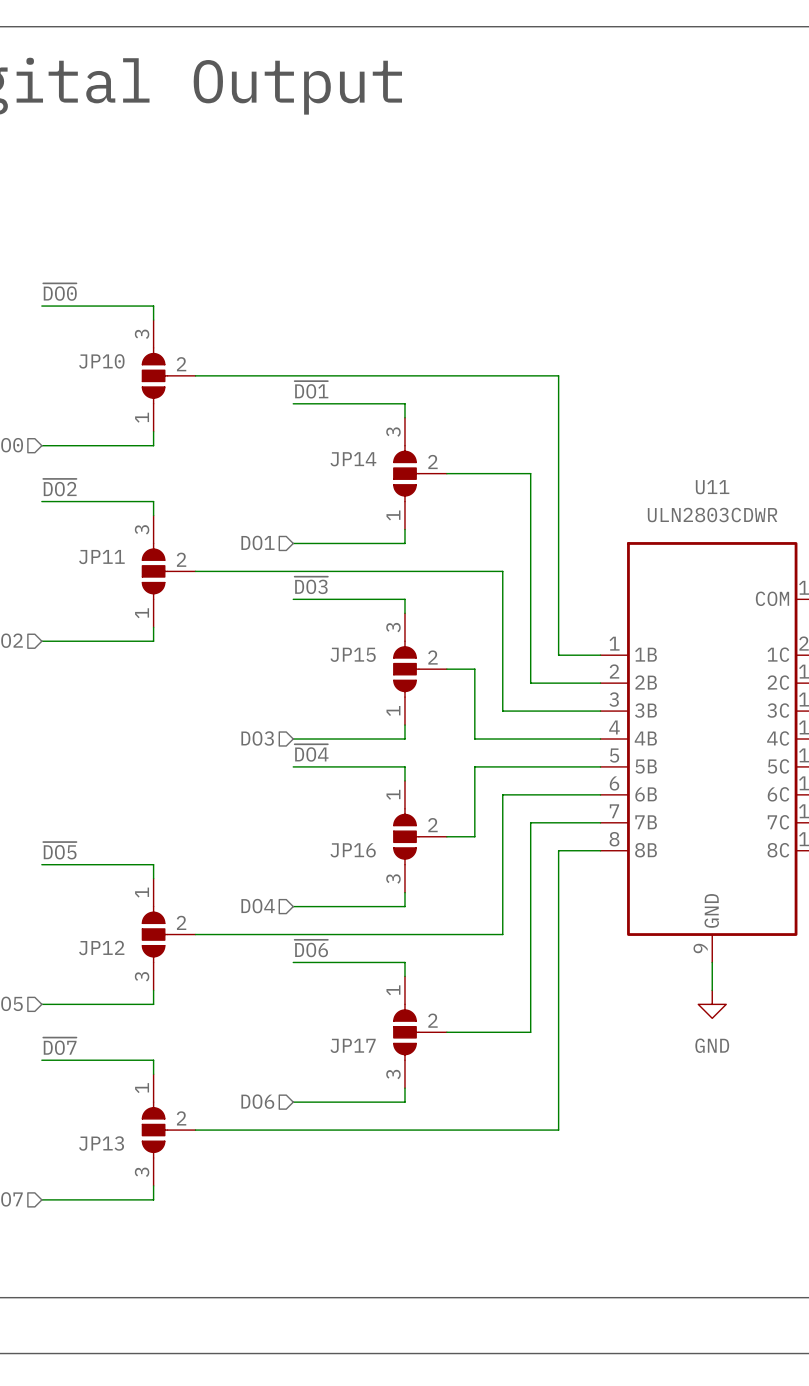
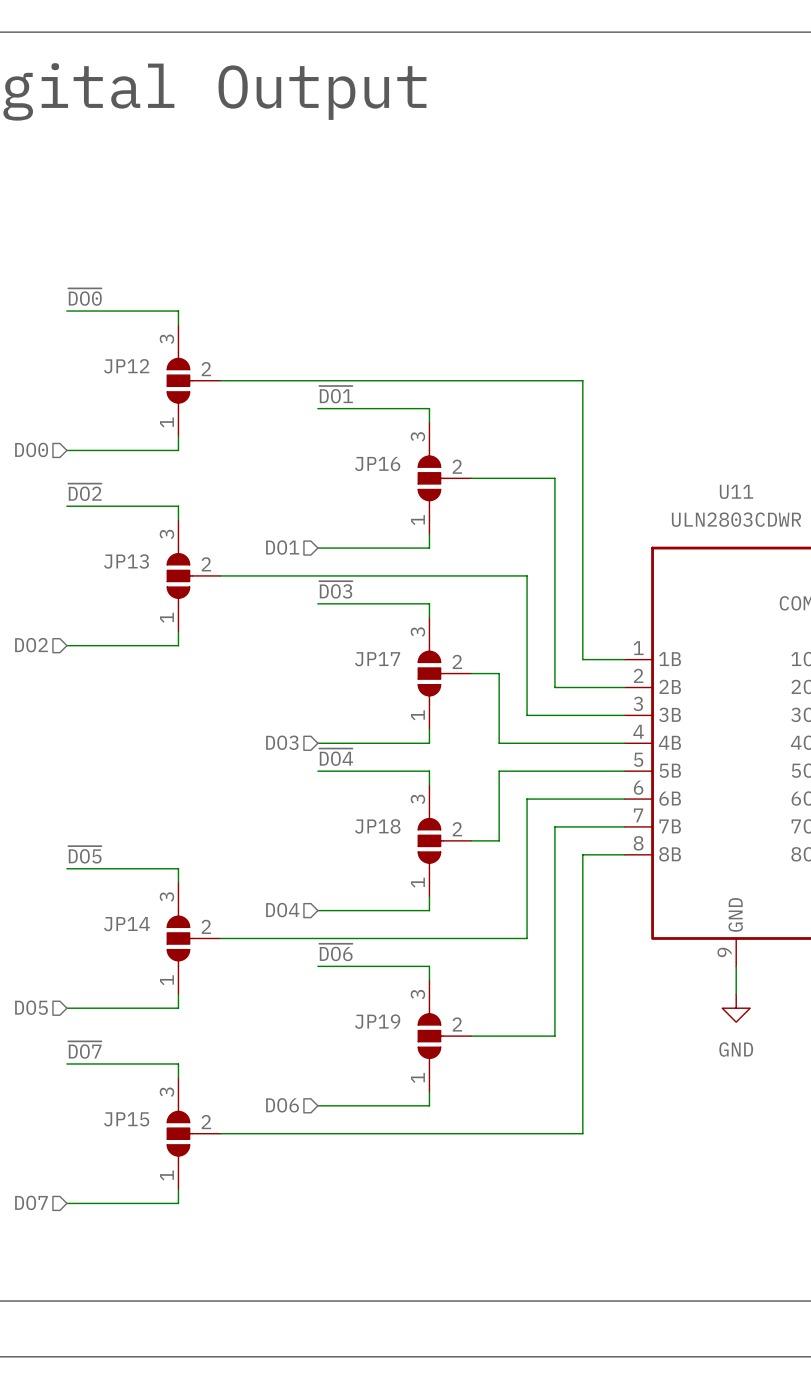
JP10 name: JP10 (101, 361) -> JP12 (126, 366)
JP14 name: JP14 (353, 459) -> JP16 (377, 464)
JP11 name: JP11 (101, 557) -> JP13 (126, 561)
JP15 name: JP15 (353, 654) -> JP17 (377, 659)
JP16 flip: as is (406, 836) -> up-down (430, 840)
JP16 name: JP16 (353, 850) -> JP18 (377, 826)
JP12 flip: as is (154, 934) -> up-down (179, 938)
JP12 name: JP12 (101, 947) -> JP14 (126, 924)
JP17 flip: as is (406, 1032) -> up-down (430, 1036)
JP17 name: JP17 (353, 1045) -> JP19 (377, 1021)
JP13 flip: as is (154, 1130) -> up-down (179, 1133)
JP13 name: JP13 (101, 1143) -> JP15 (126, 1119)

